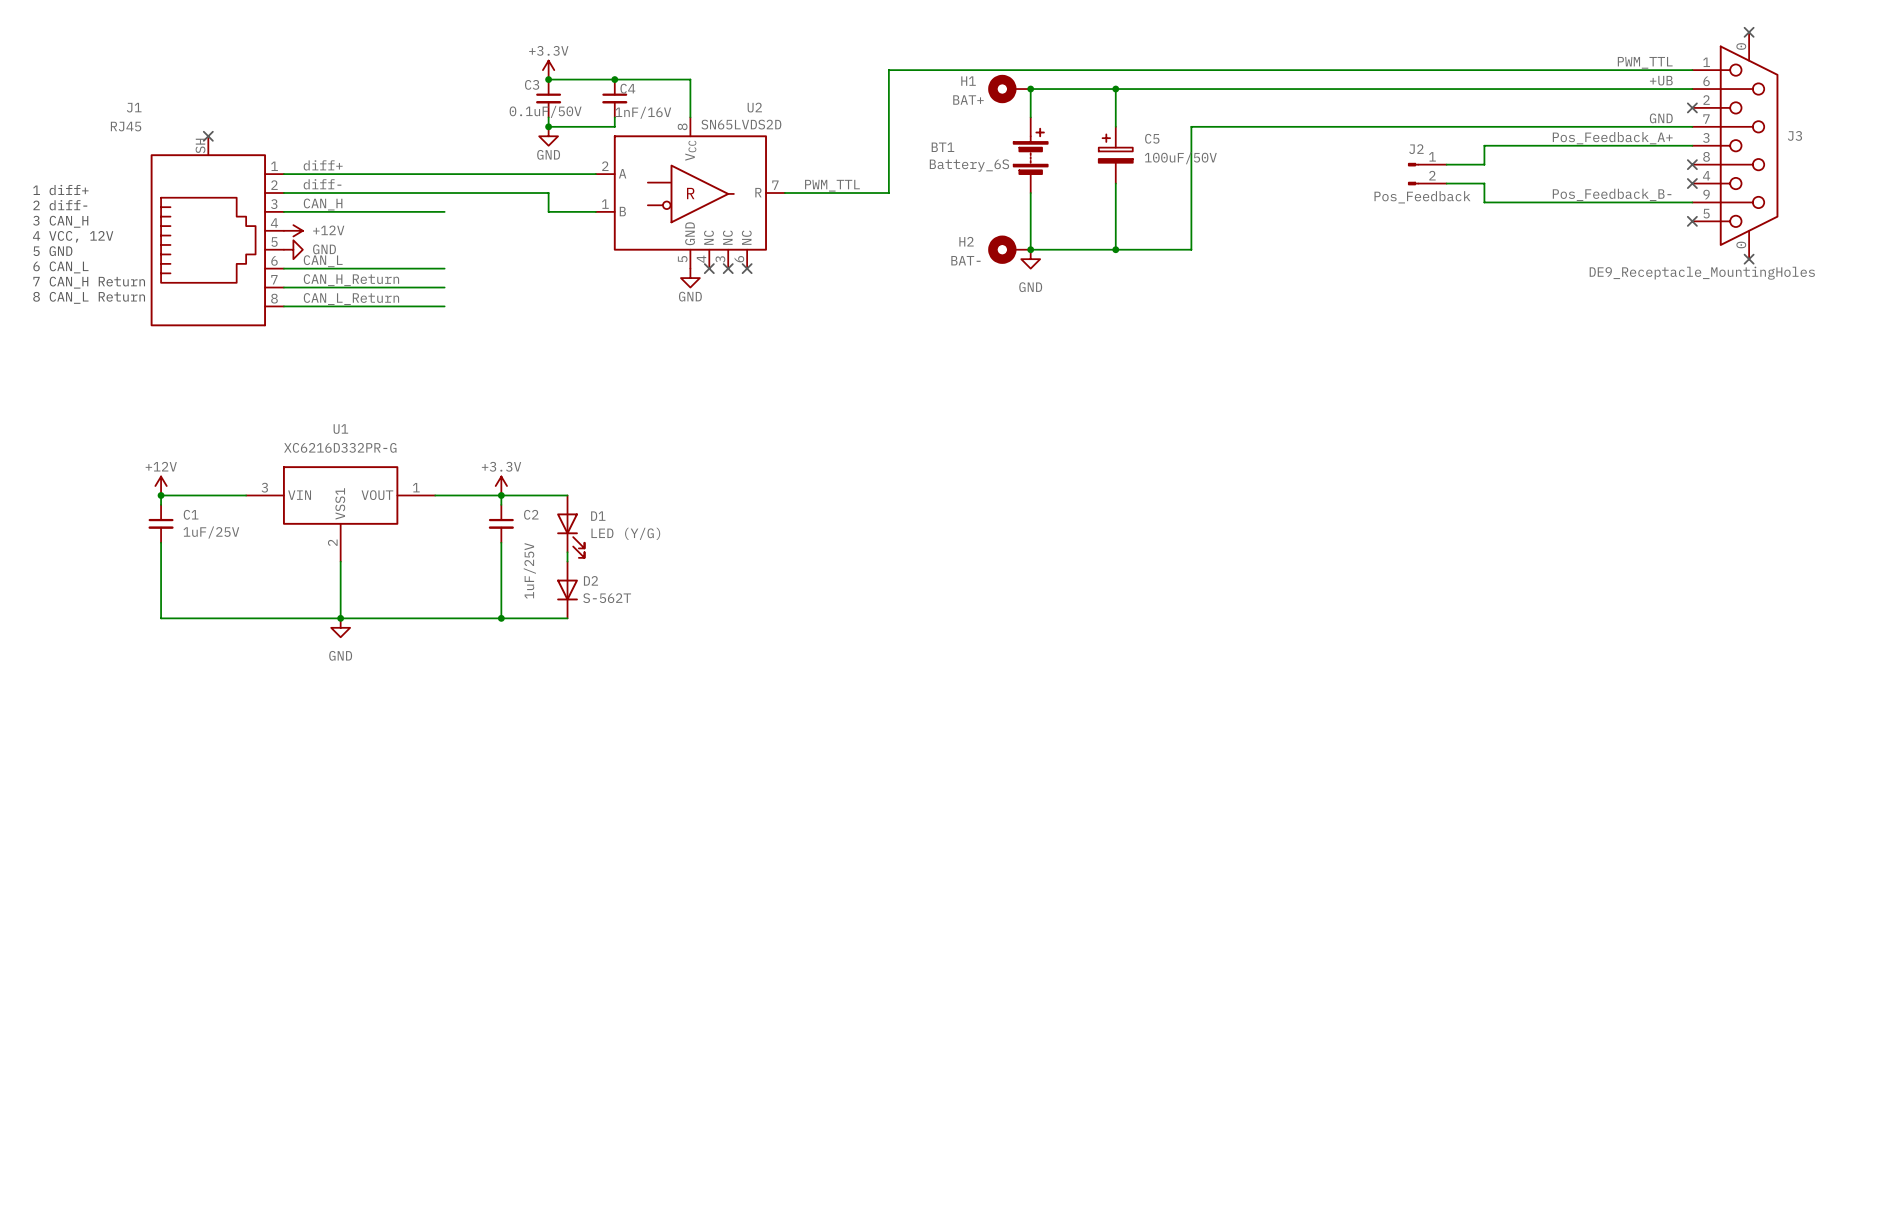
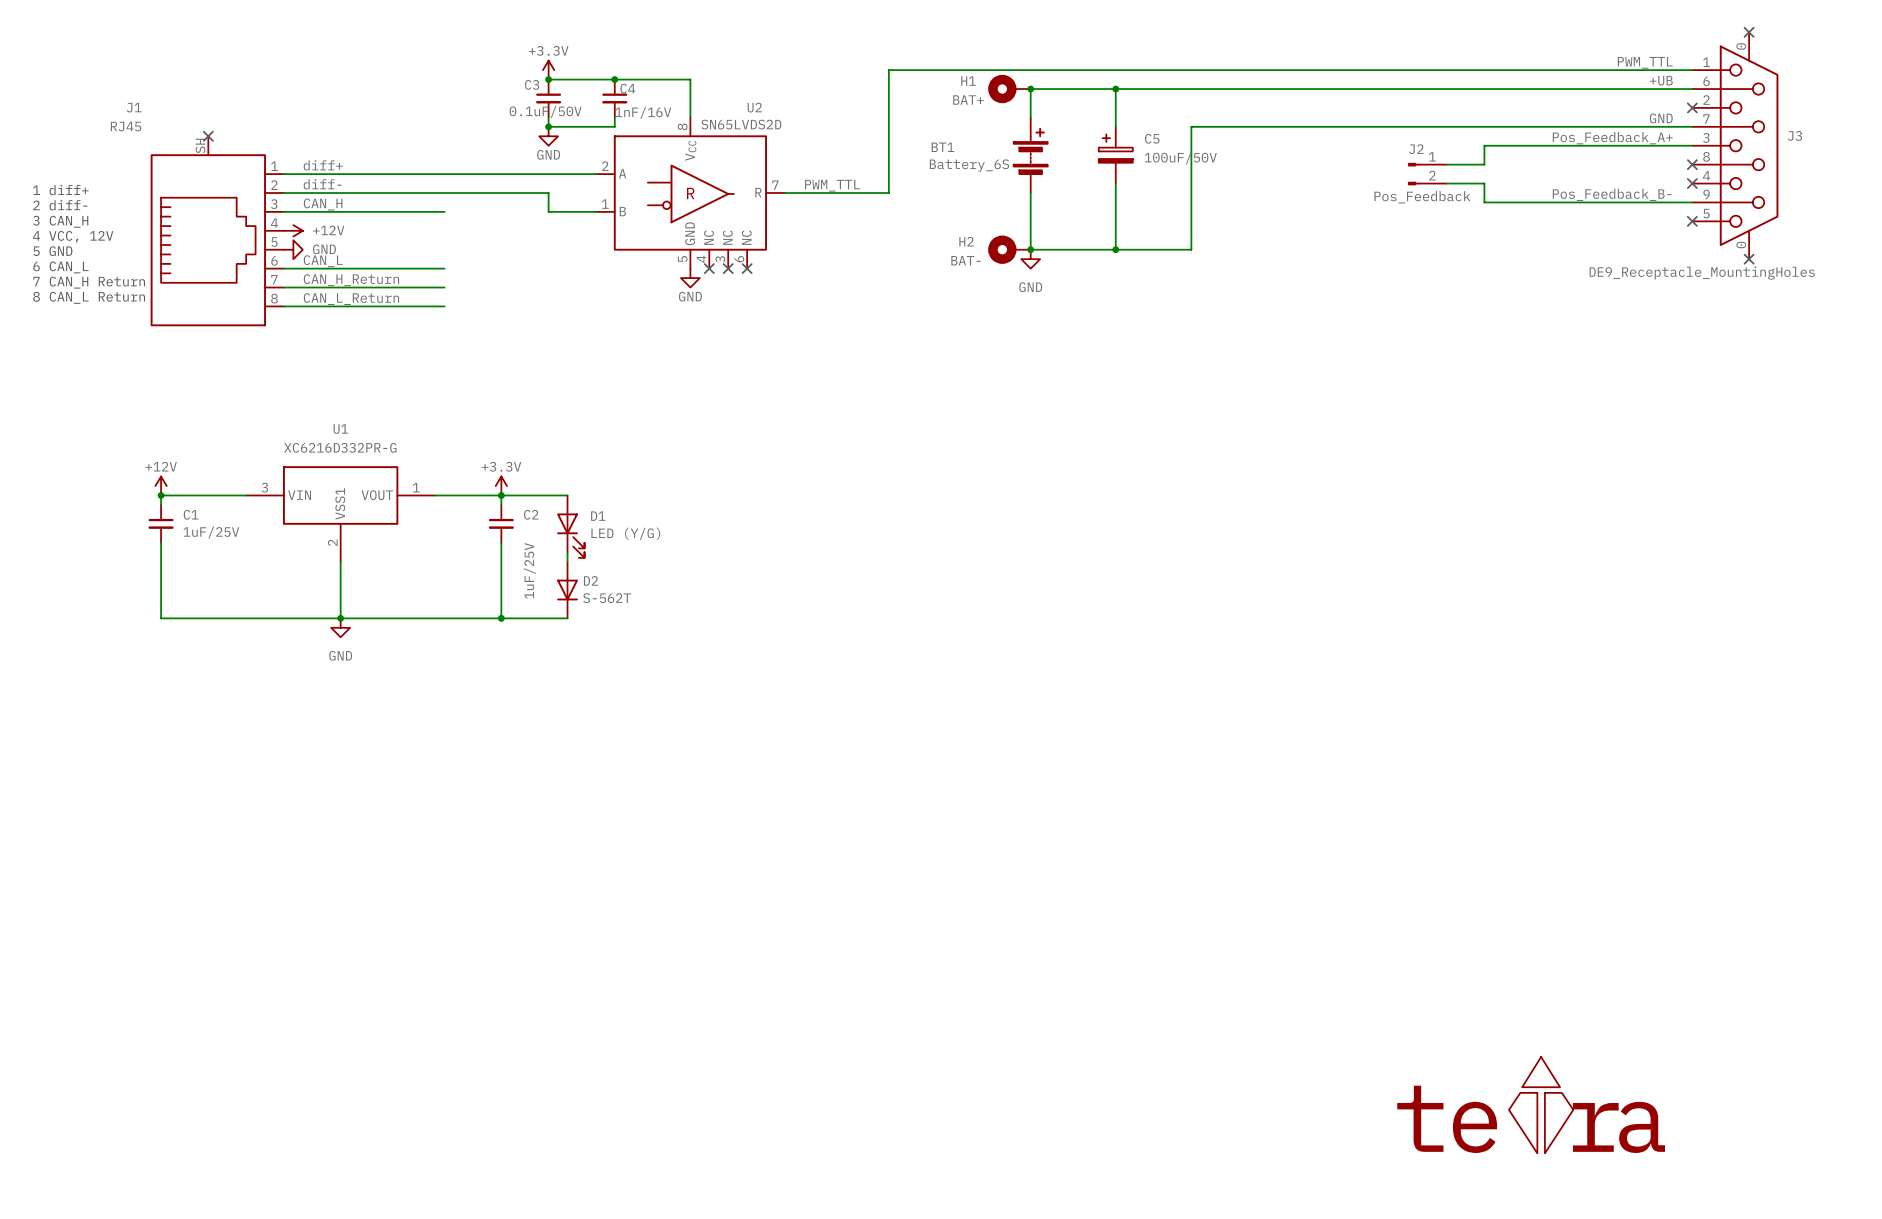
part: none -> (1541, 1105)

